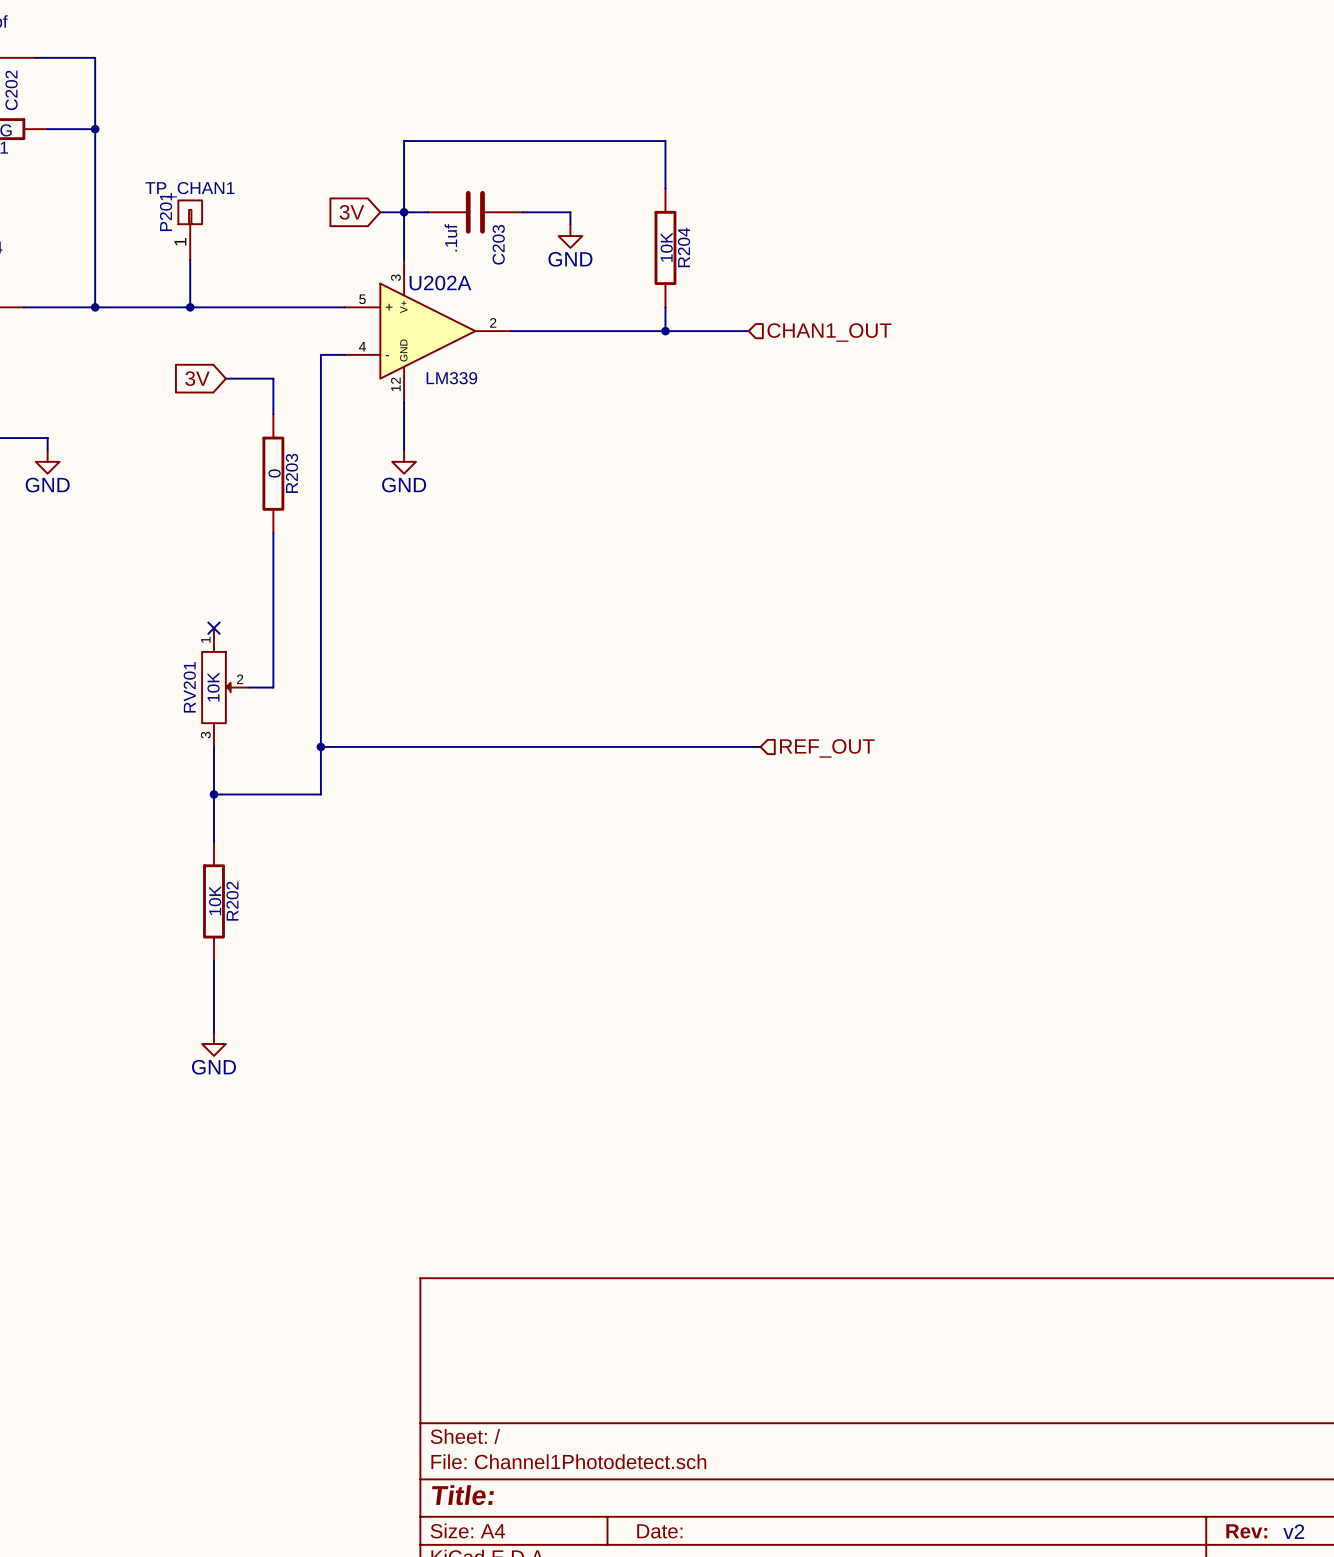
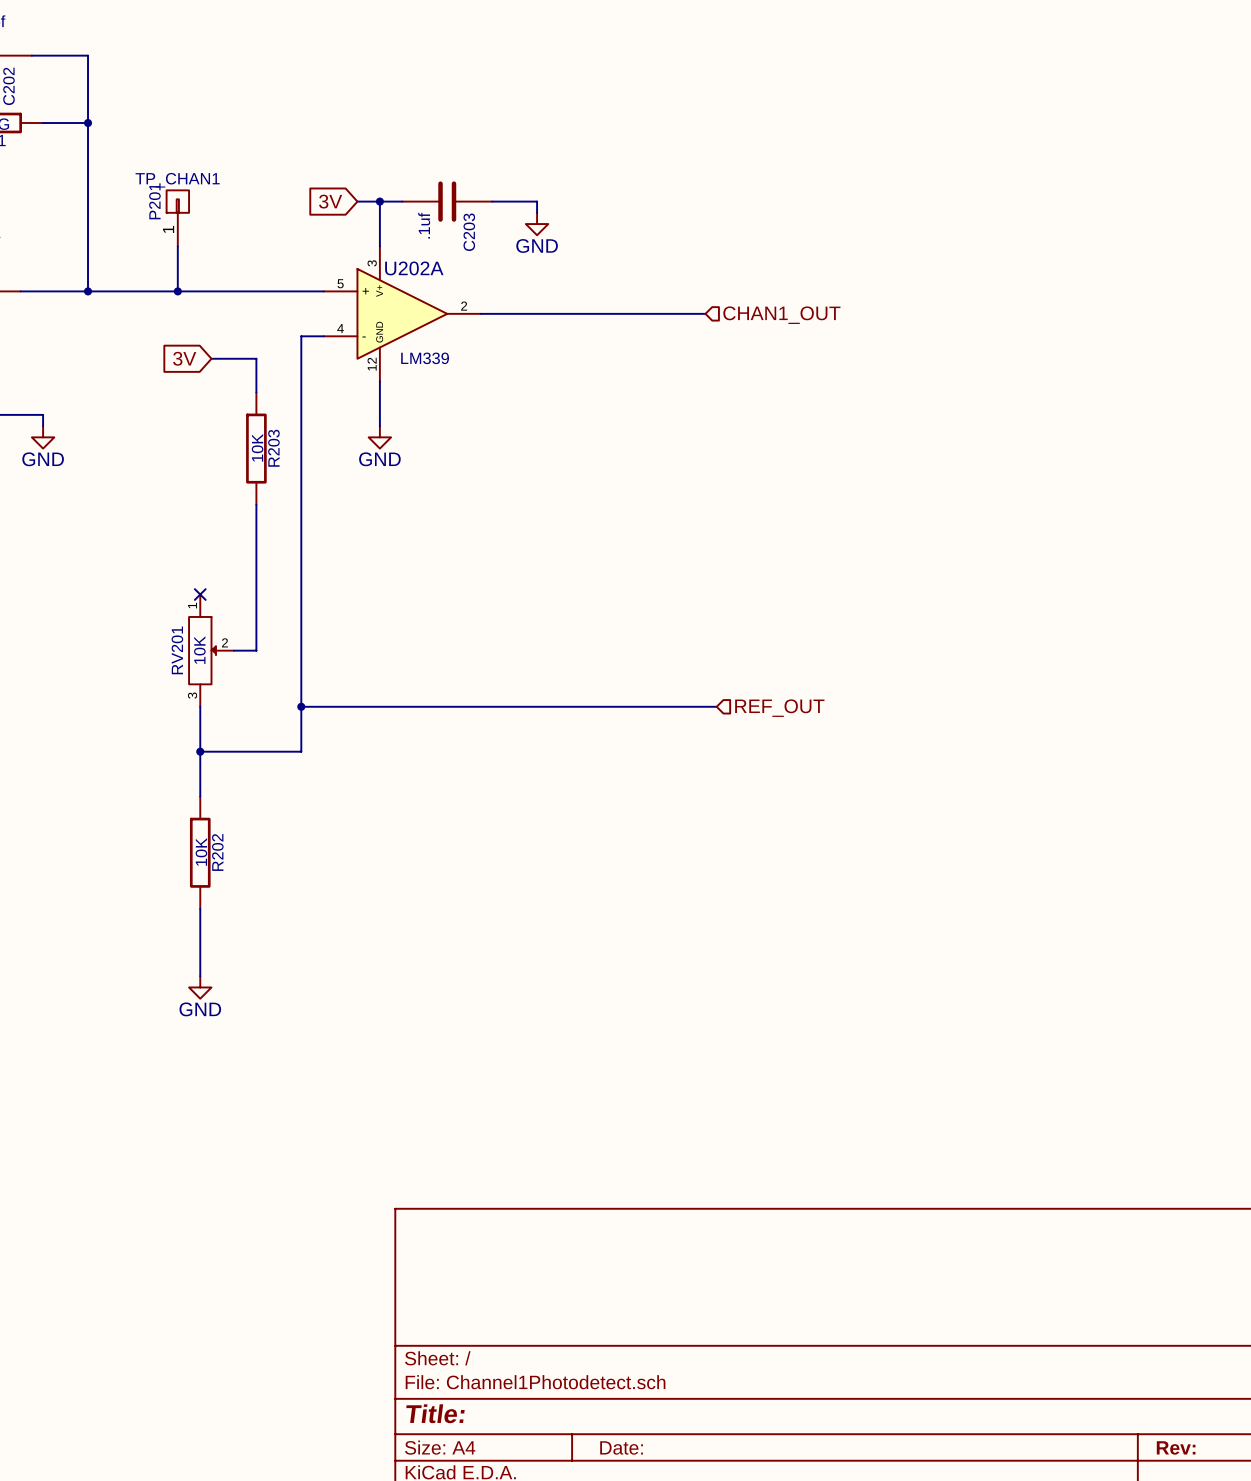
wire: (665, 188) (665, 141) (404, 141) (404, 212) -> none
R204: 10K (665, 247) -> none
wire: (665, 307) (665, 331) -> none
junction: (665, 331) -> none
R203 value: 0 (274, 473) -> 10K (257, 447)
text: v2 (1293, 1531) -> none

